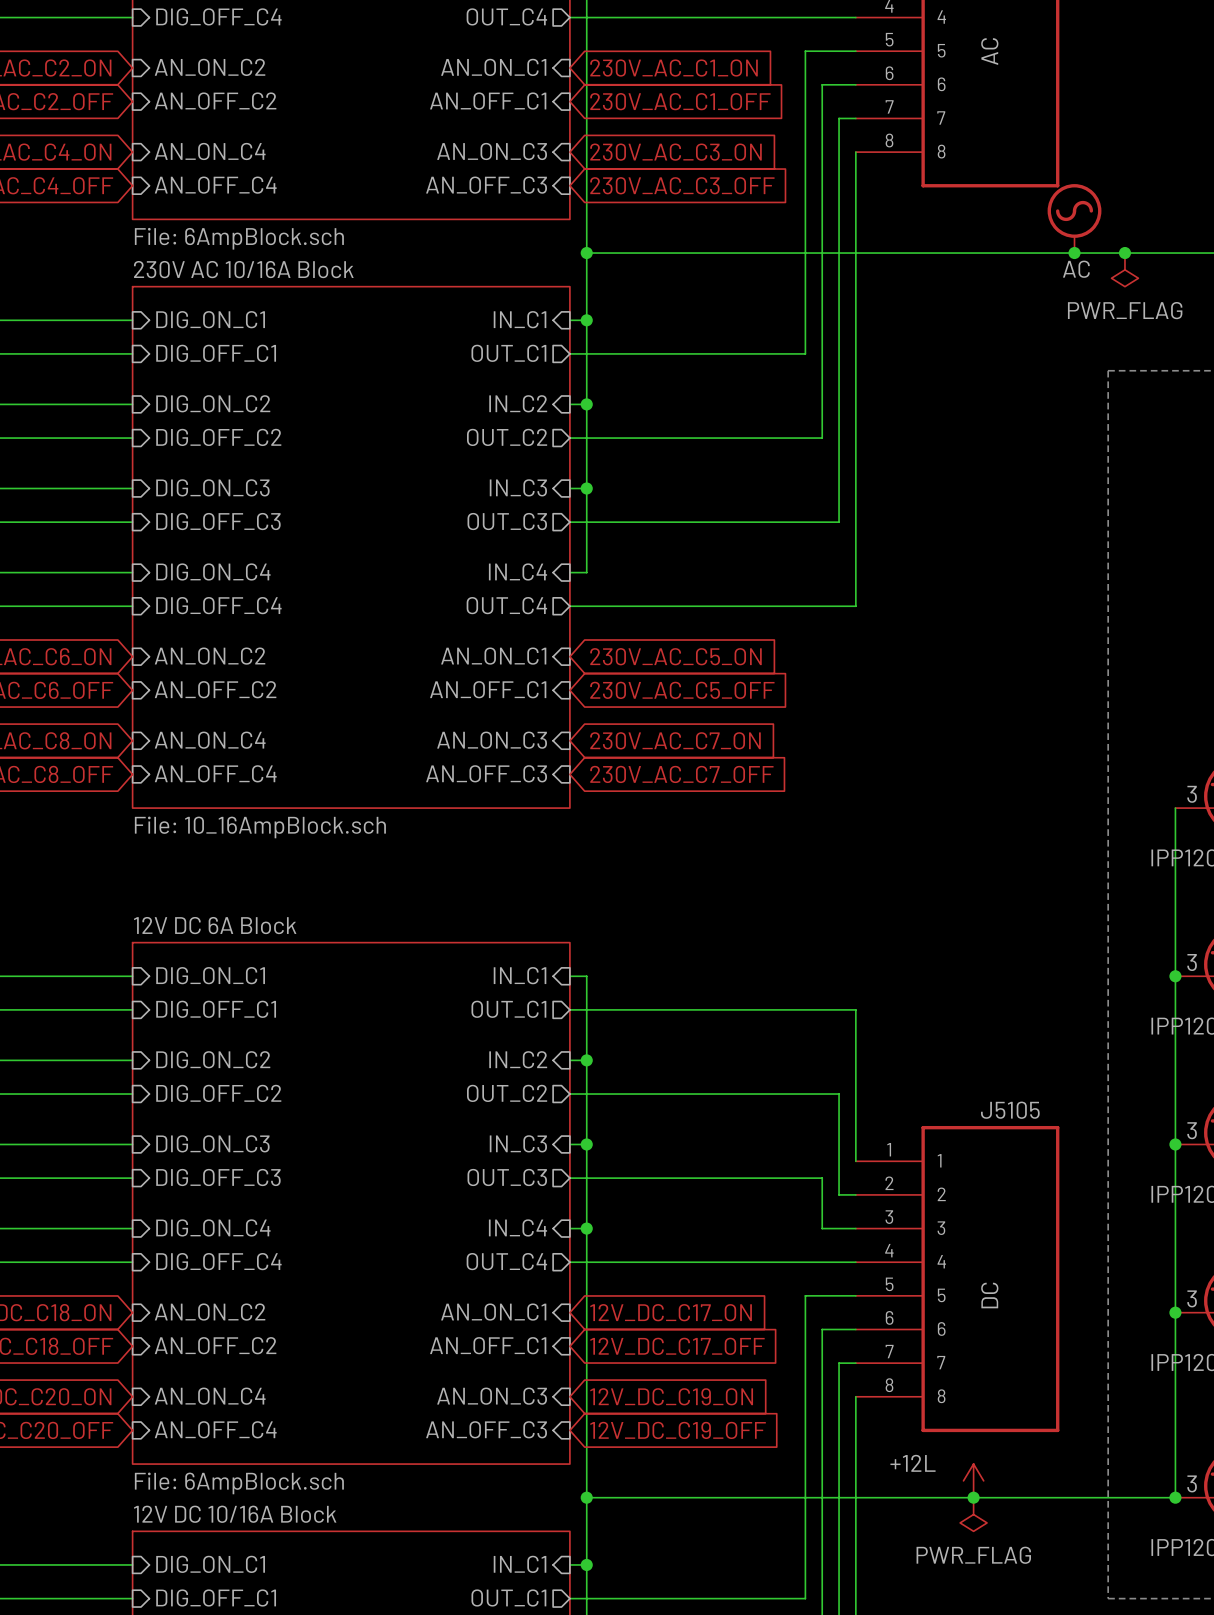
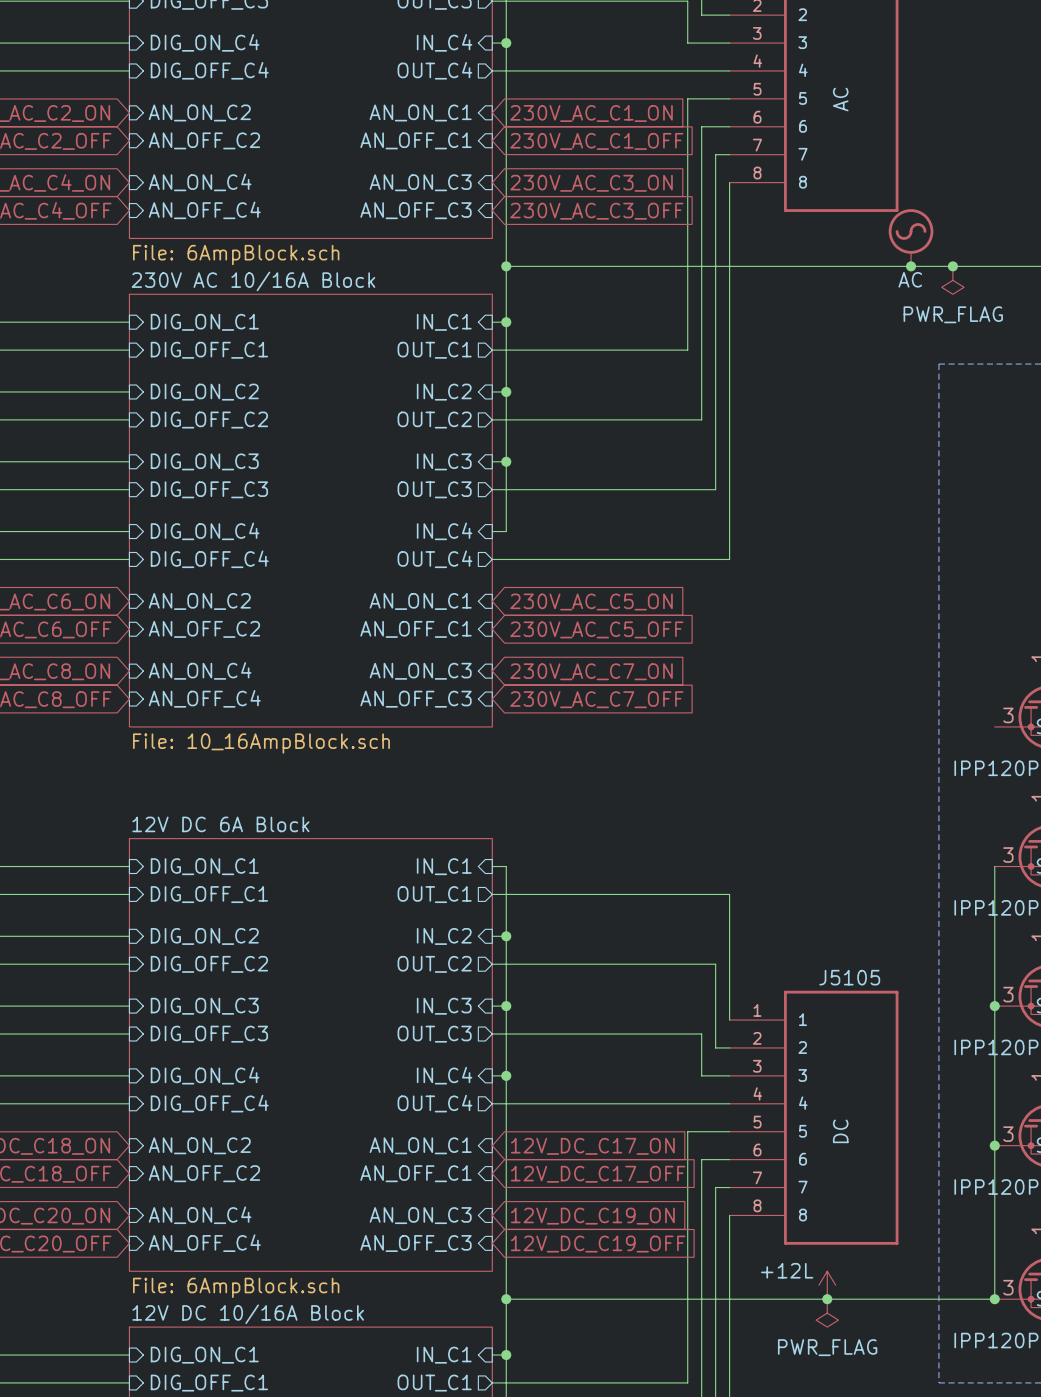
wire: (1175, 808) (1175, 976) -> none
junction: (1175, 976) -> none

